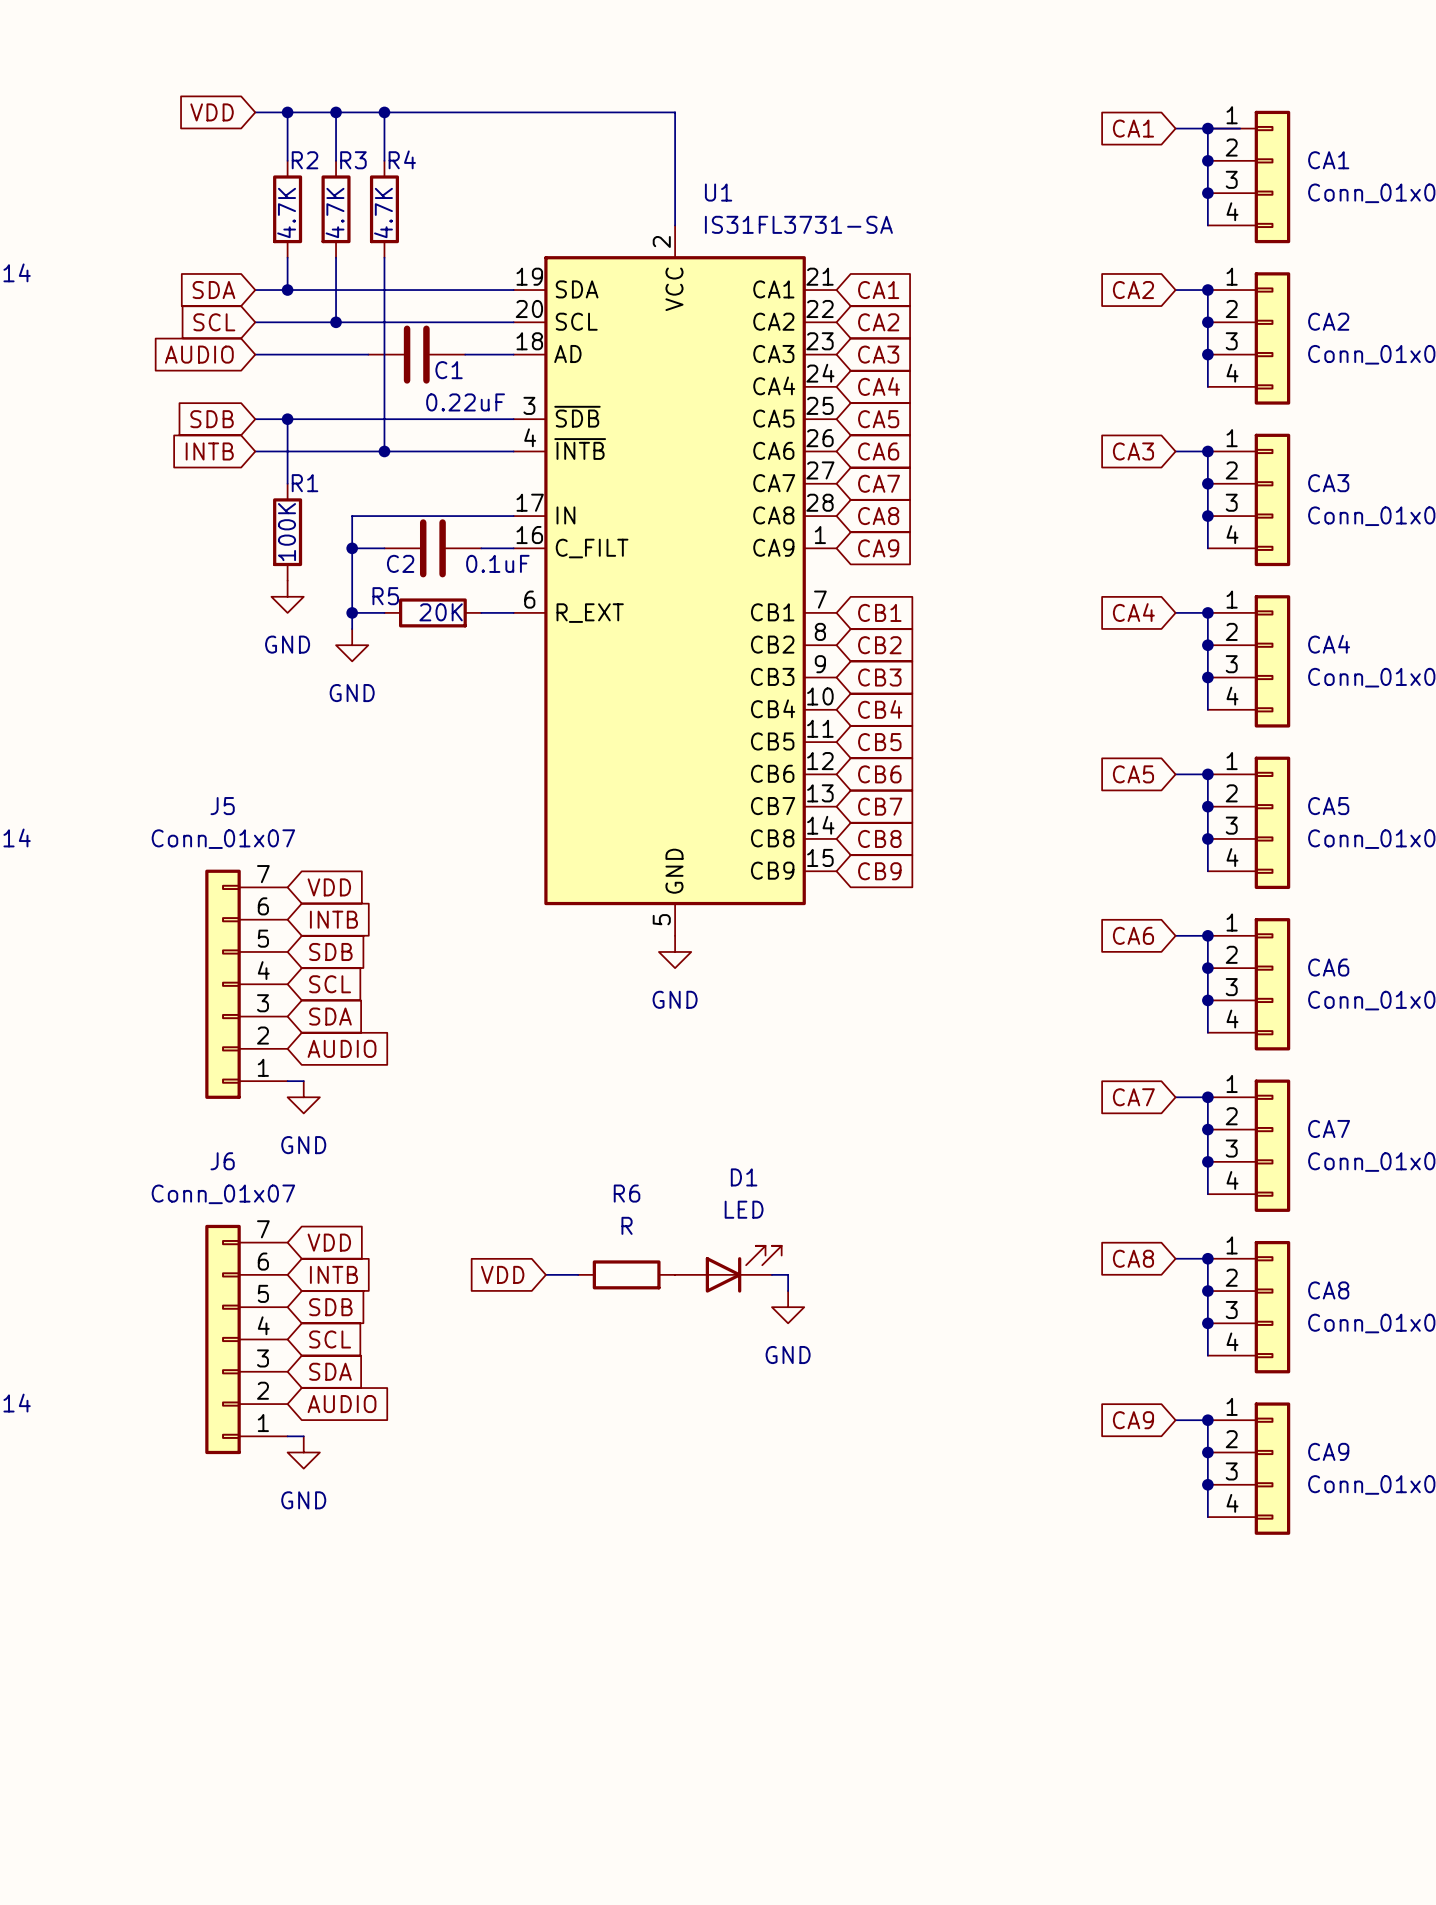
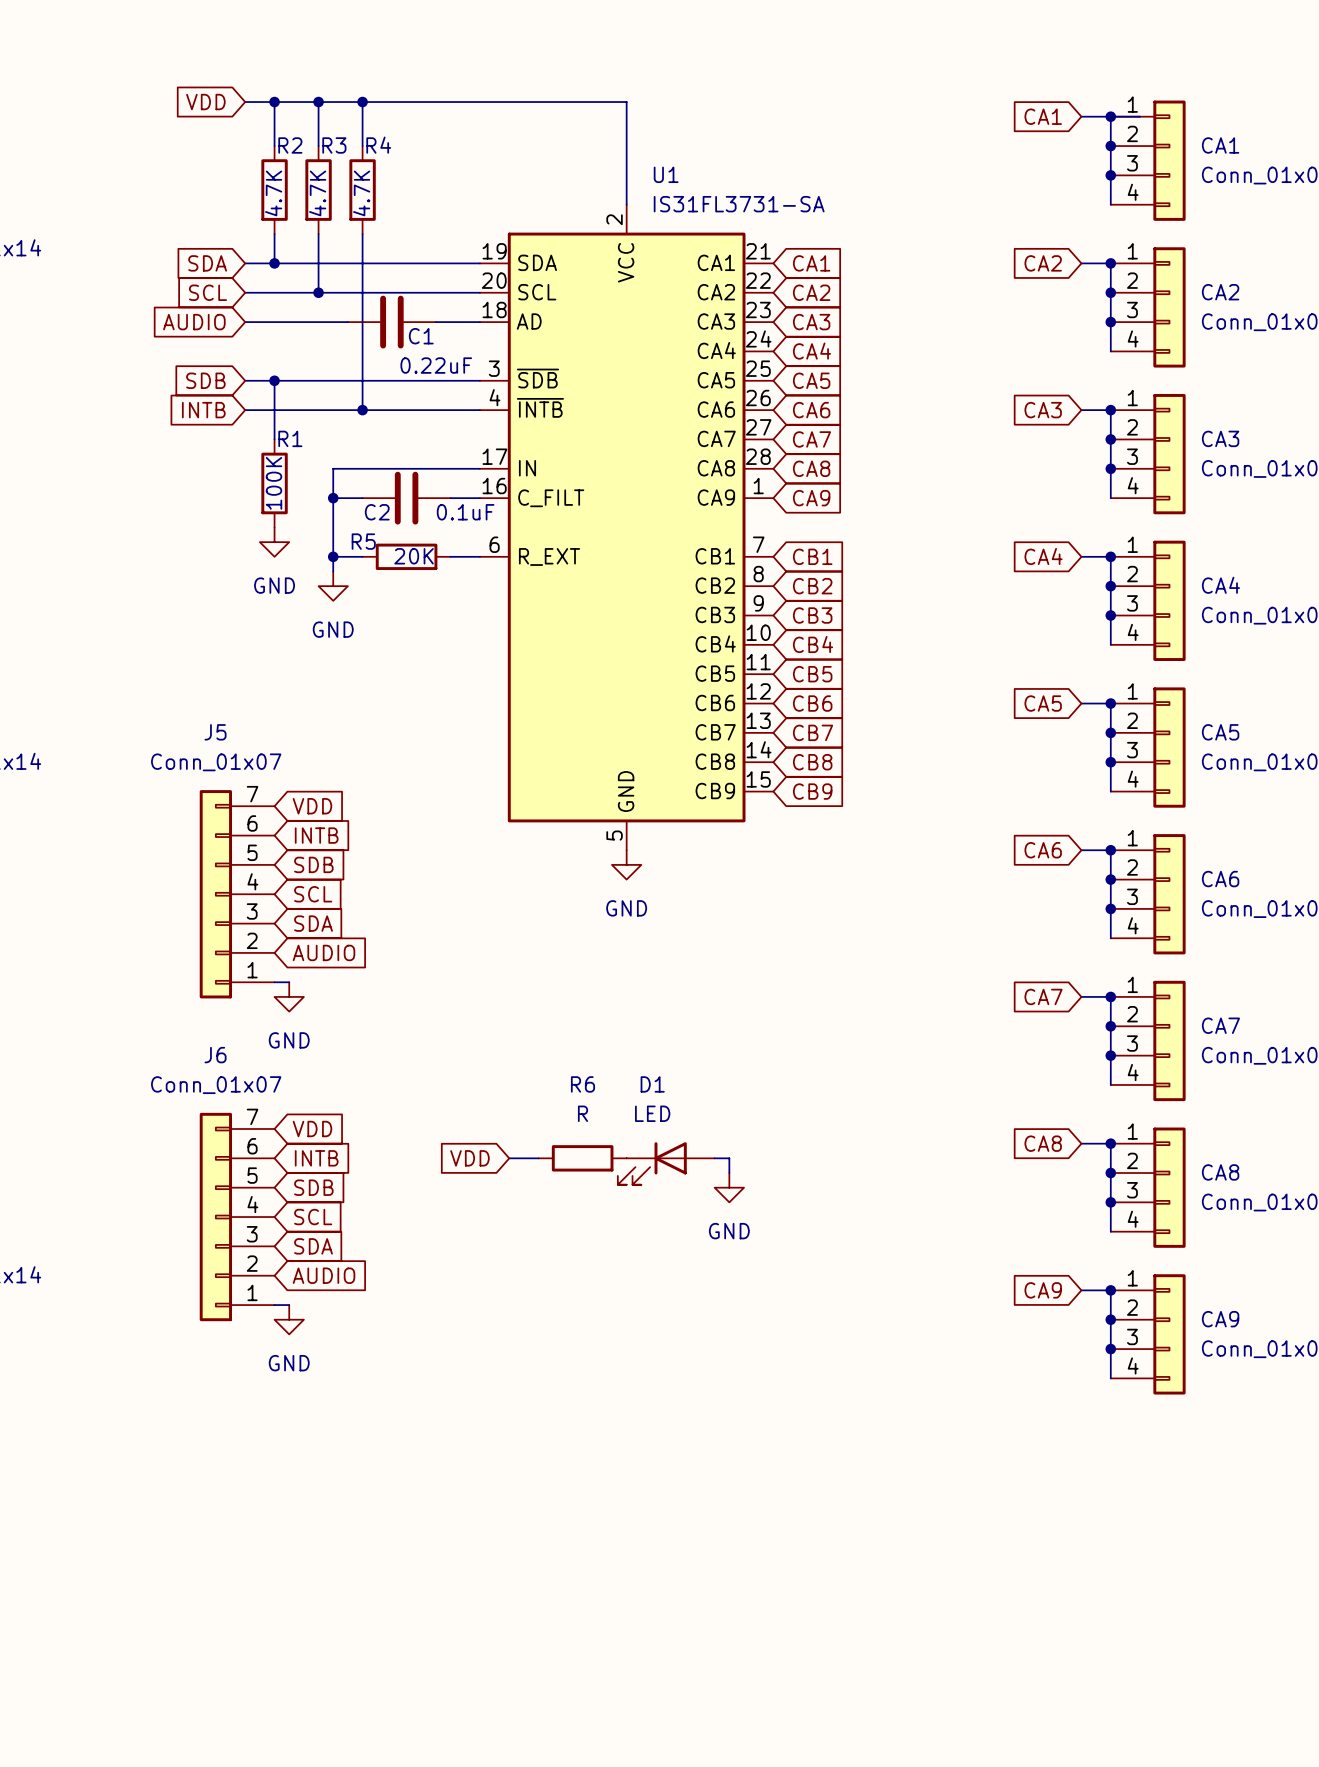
D1 name position: D1 (744, 1177) -> D1 (652, 1084)
D1 value position: LED (744, 1209) -> LED (652, 1113)
D1 rotation: 0° (743, 1269) -> 180° (652, 1163)

